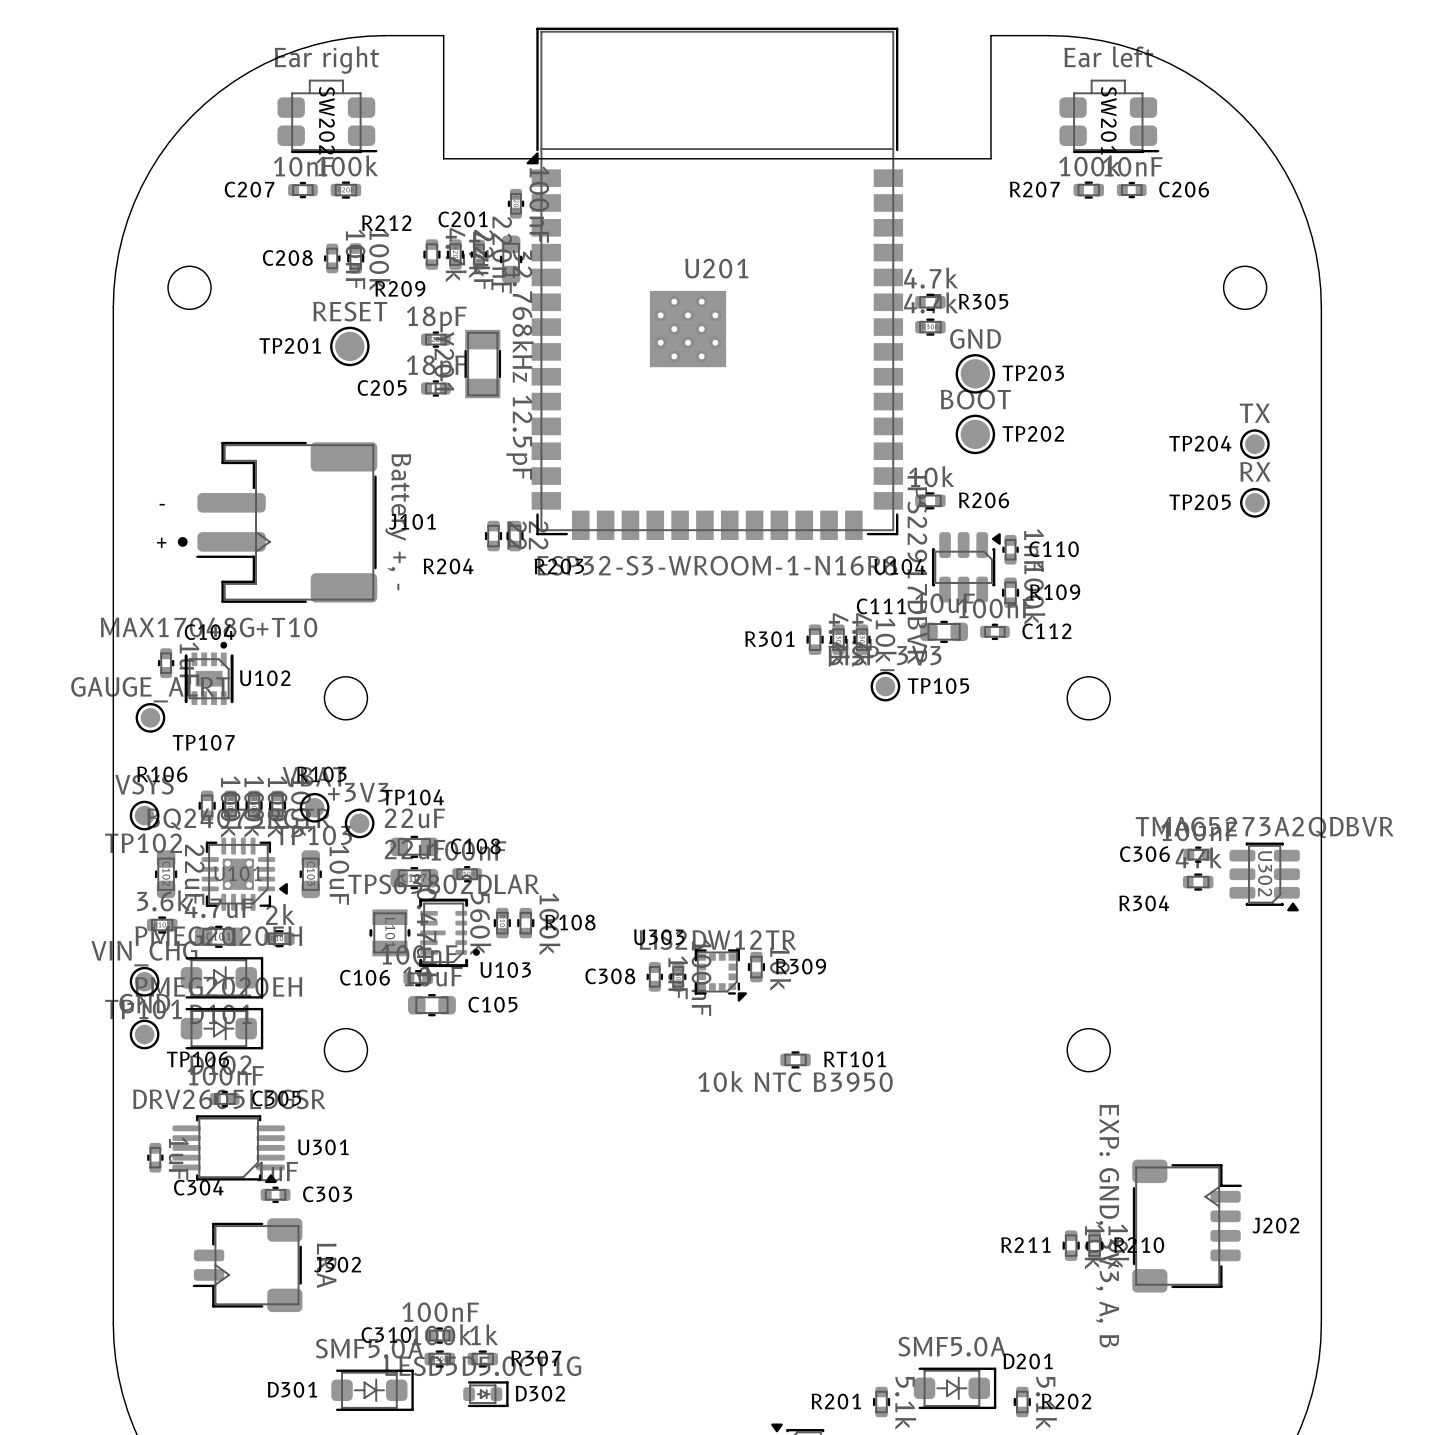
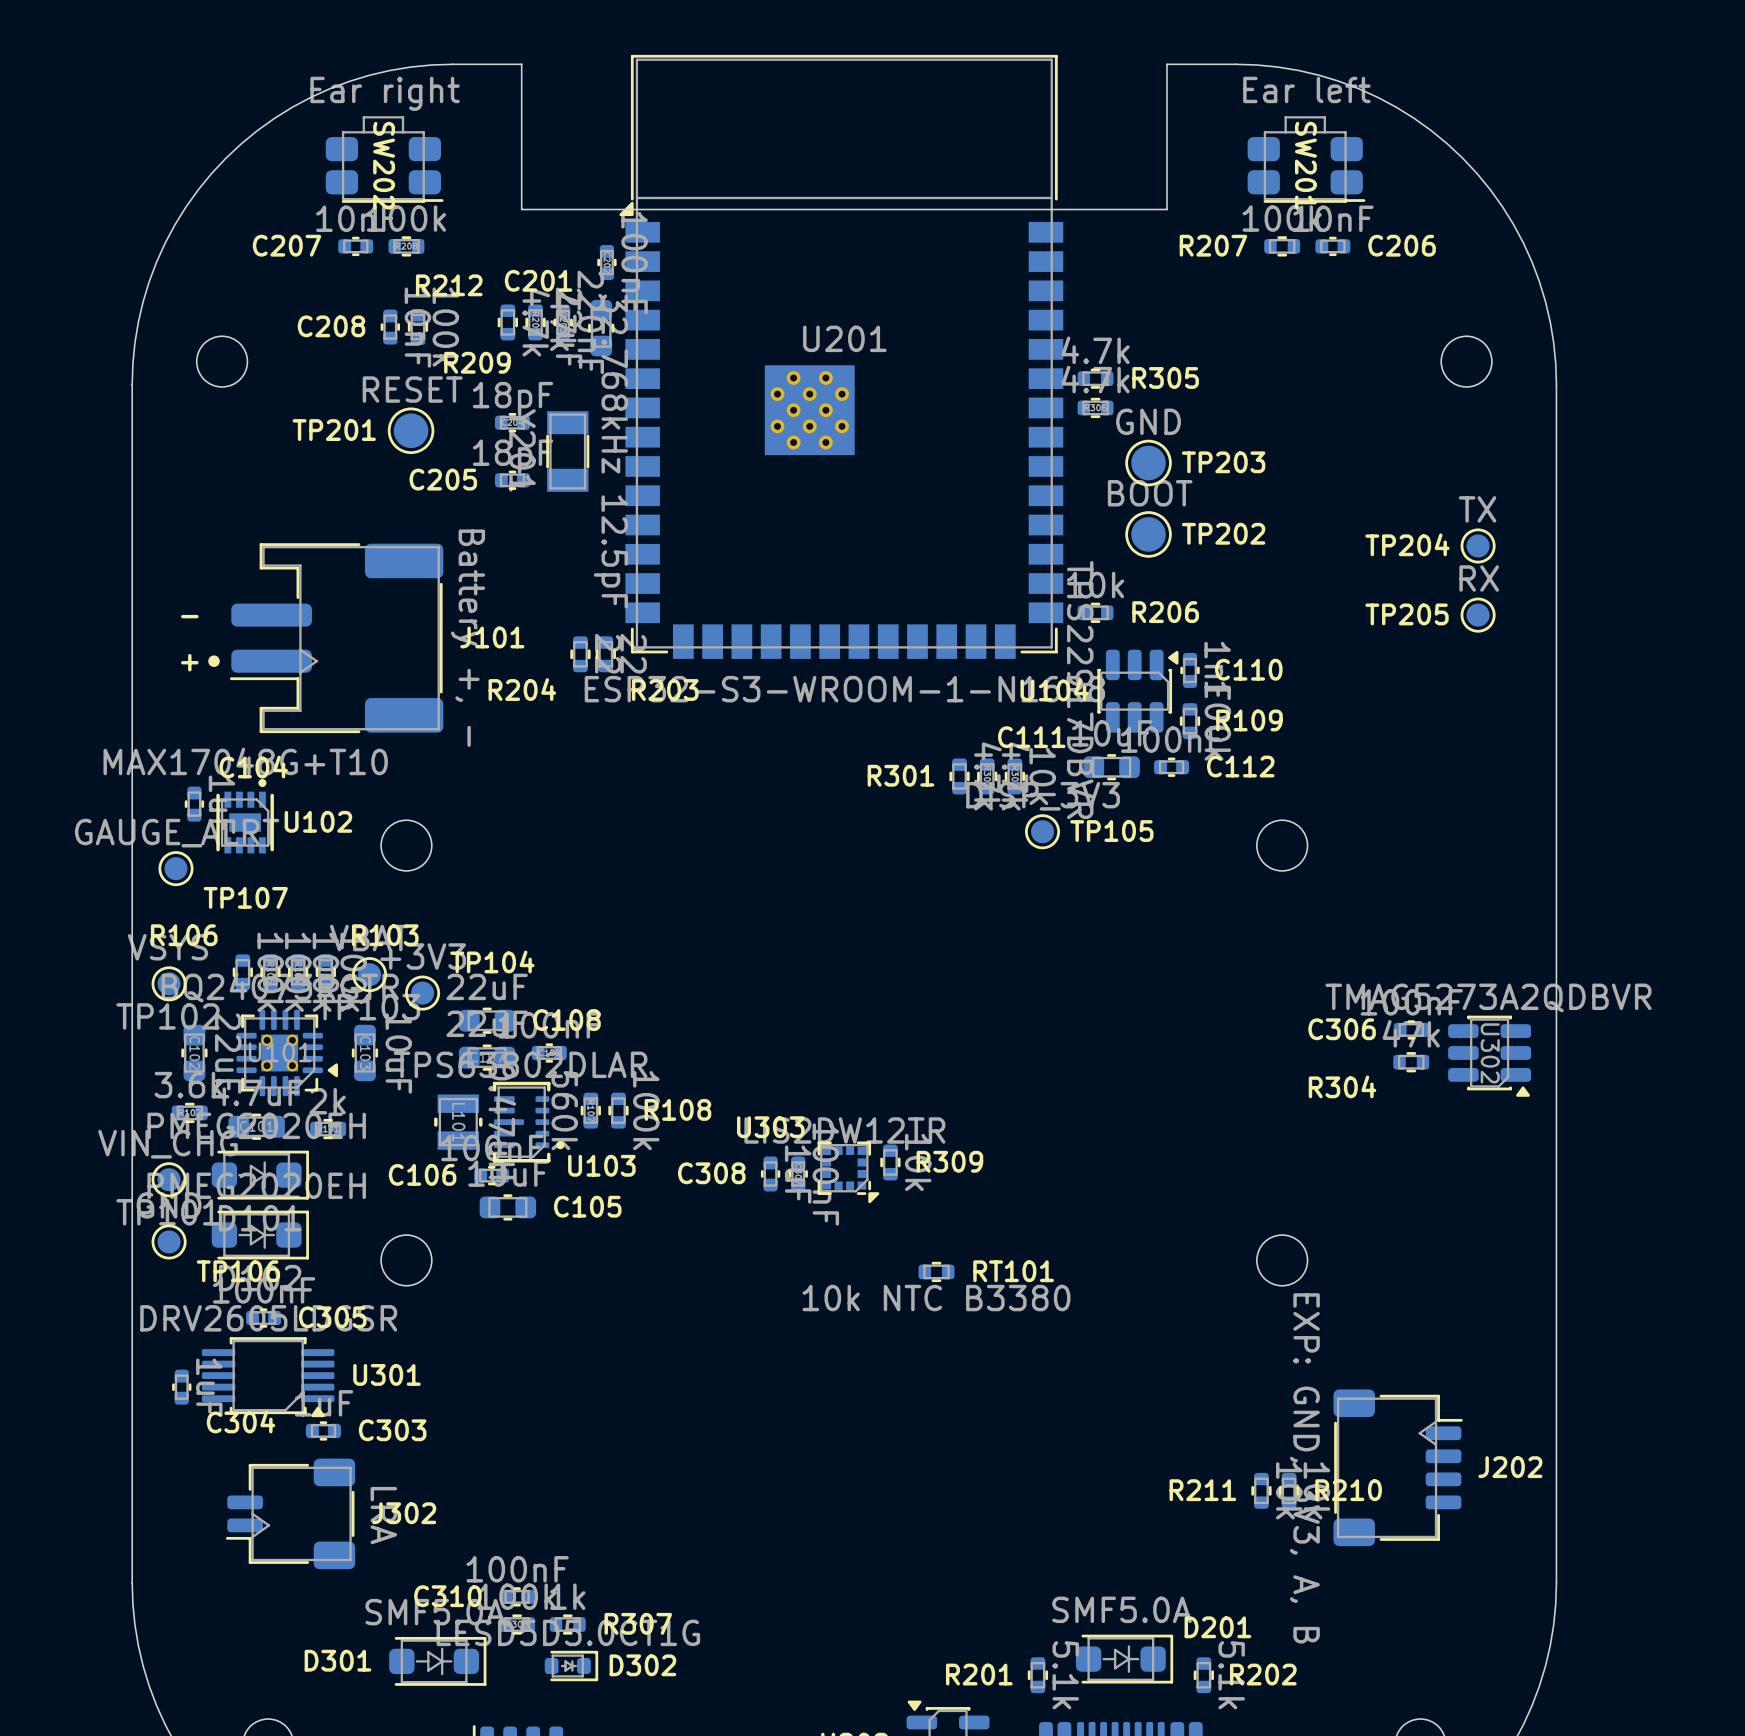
RT101 value: 10k NTC B3950 (795, 1081) -> 10k NTC B3380 (936, 1298)

